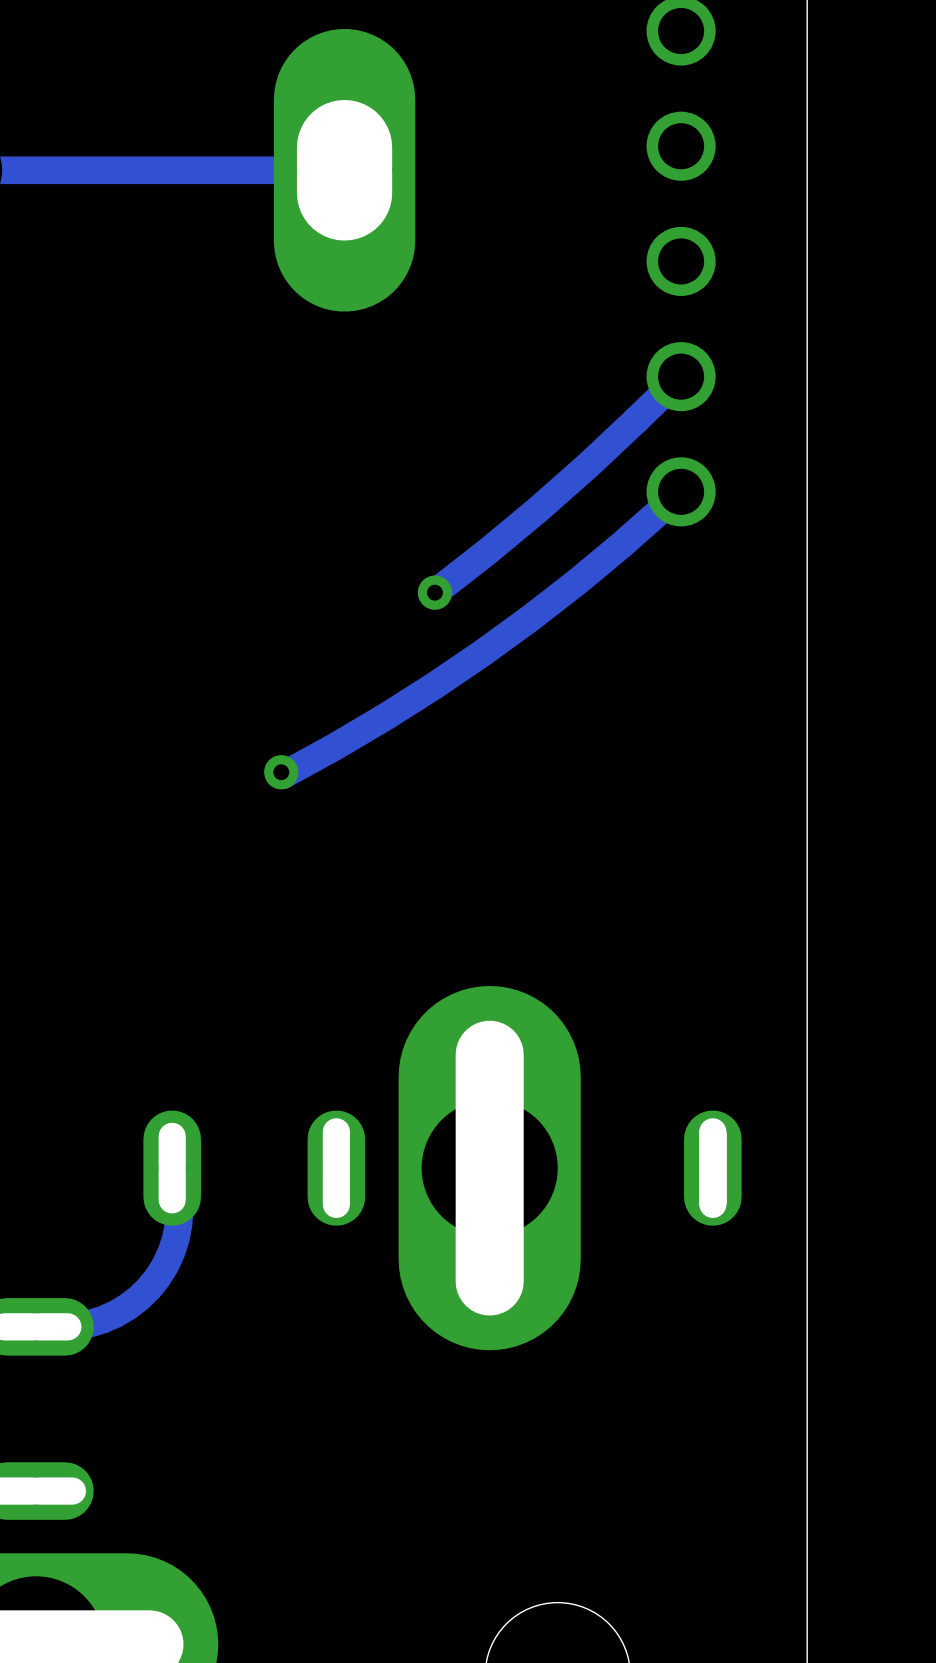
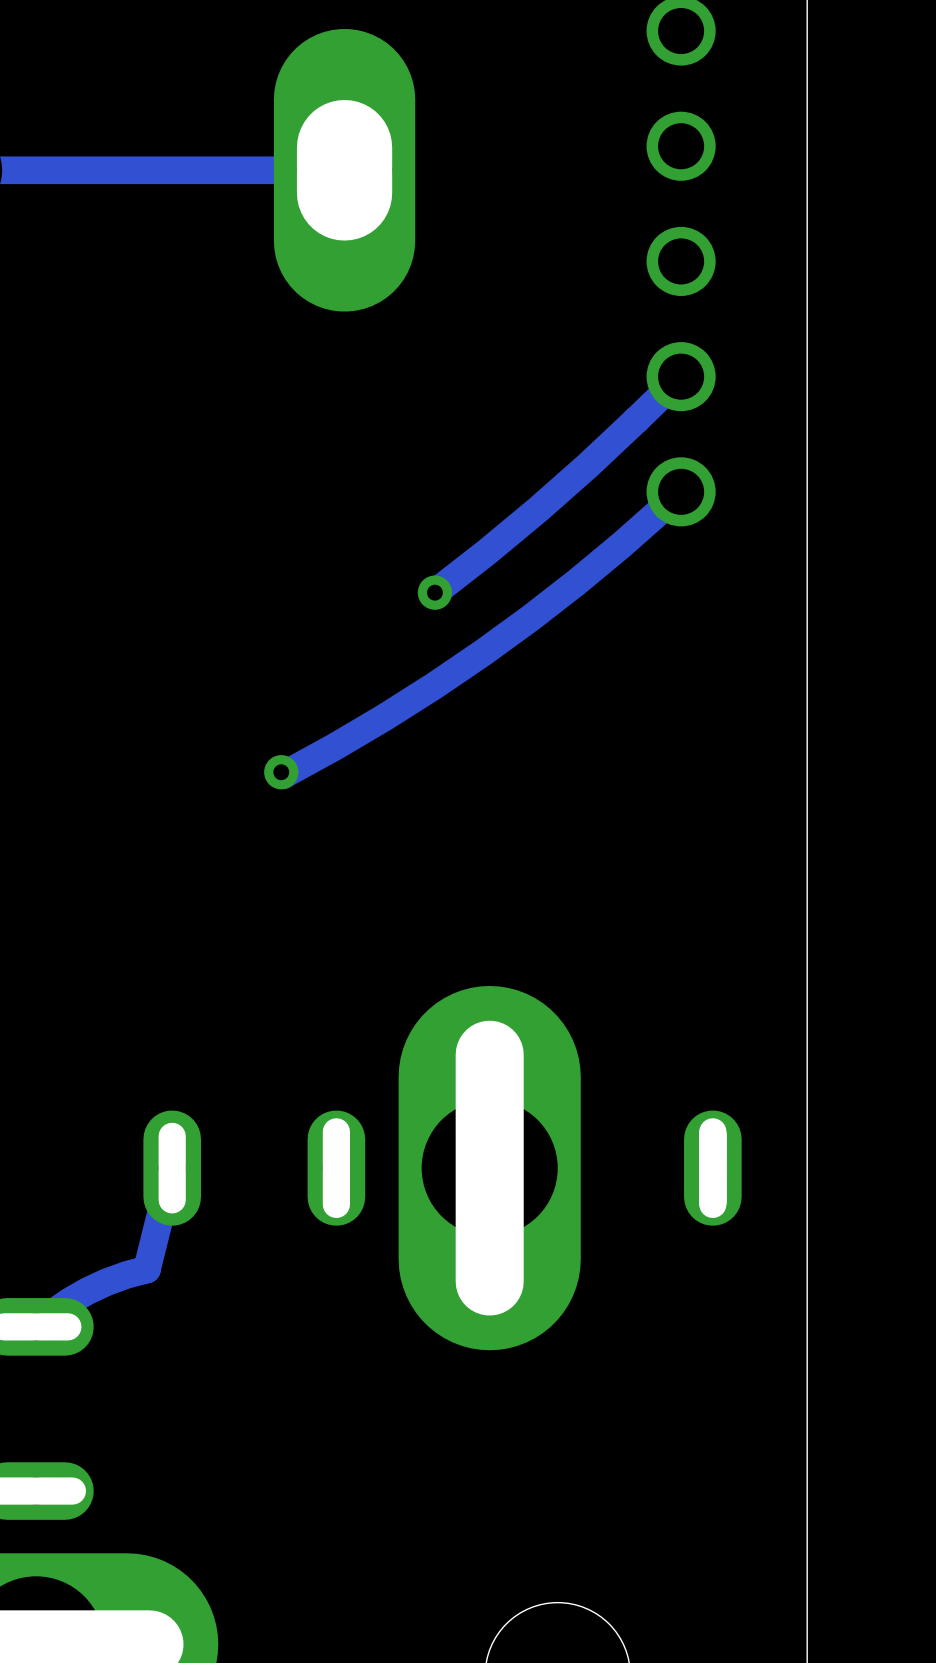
track: (172, 1168) (178, 1195) (178, 1224) (171, 1251) (165, 1264) (149, 1288) (127, 1306) (102, 1319) (74, 1326) (36, 1326) -> (172, 1168) (146, 1269) (106, 1282) (87, 1290) (52, 1313) (36, 1326)

